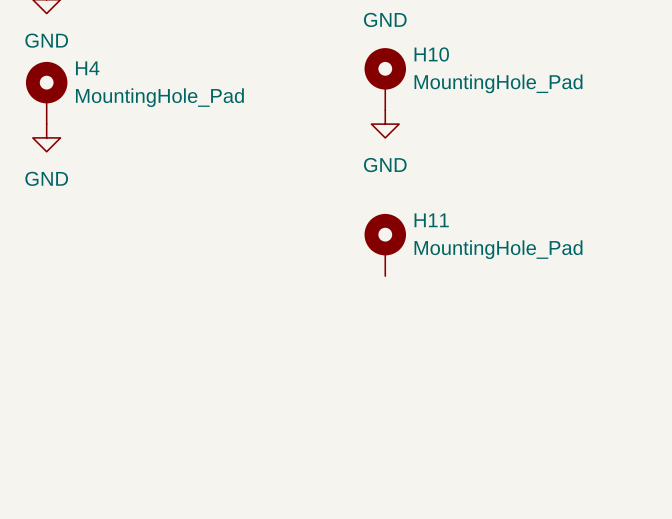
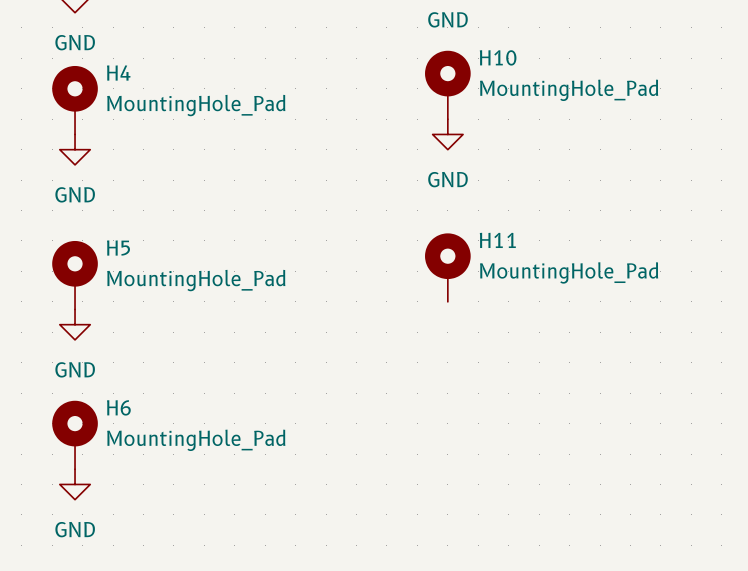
H5: none -> MountingHole_Pad (75, 275)
power symbol: none -> GND (75, 324)
H6: none -> MountingHole_Pad (75, 435)
power symbol: none -> GND (75, 484)

